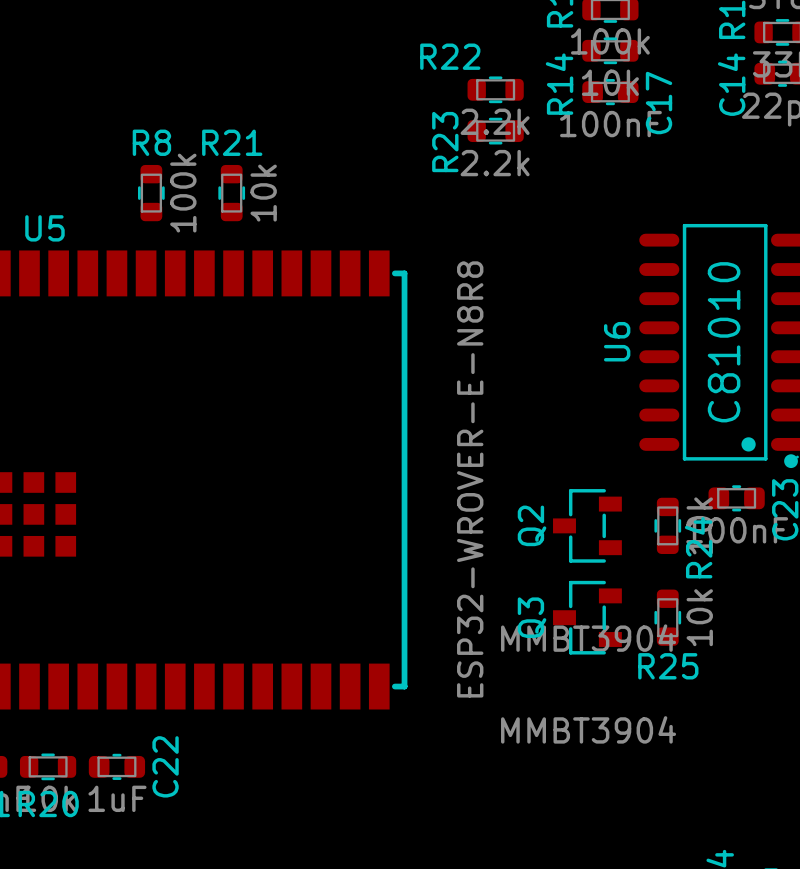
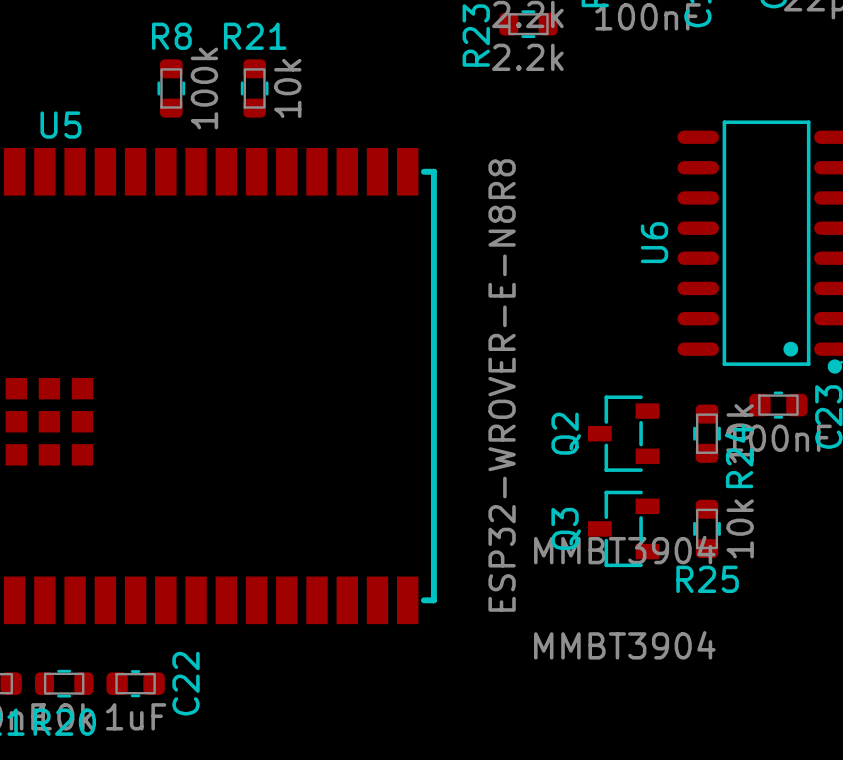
U6 text: C81010 (724, 342) -> none

